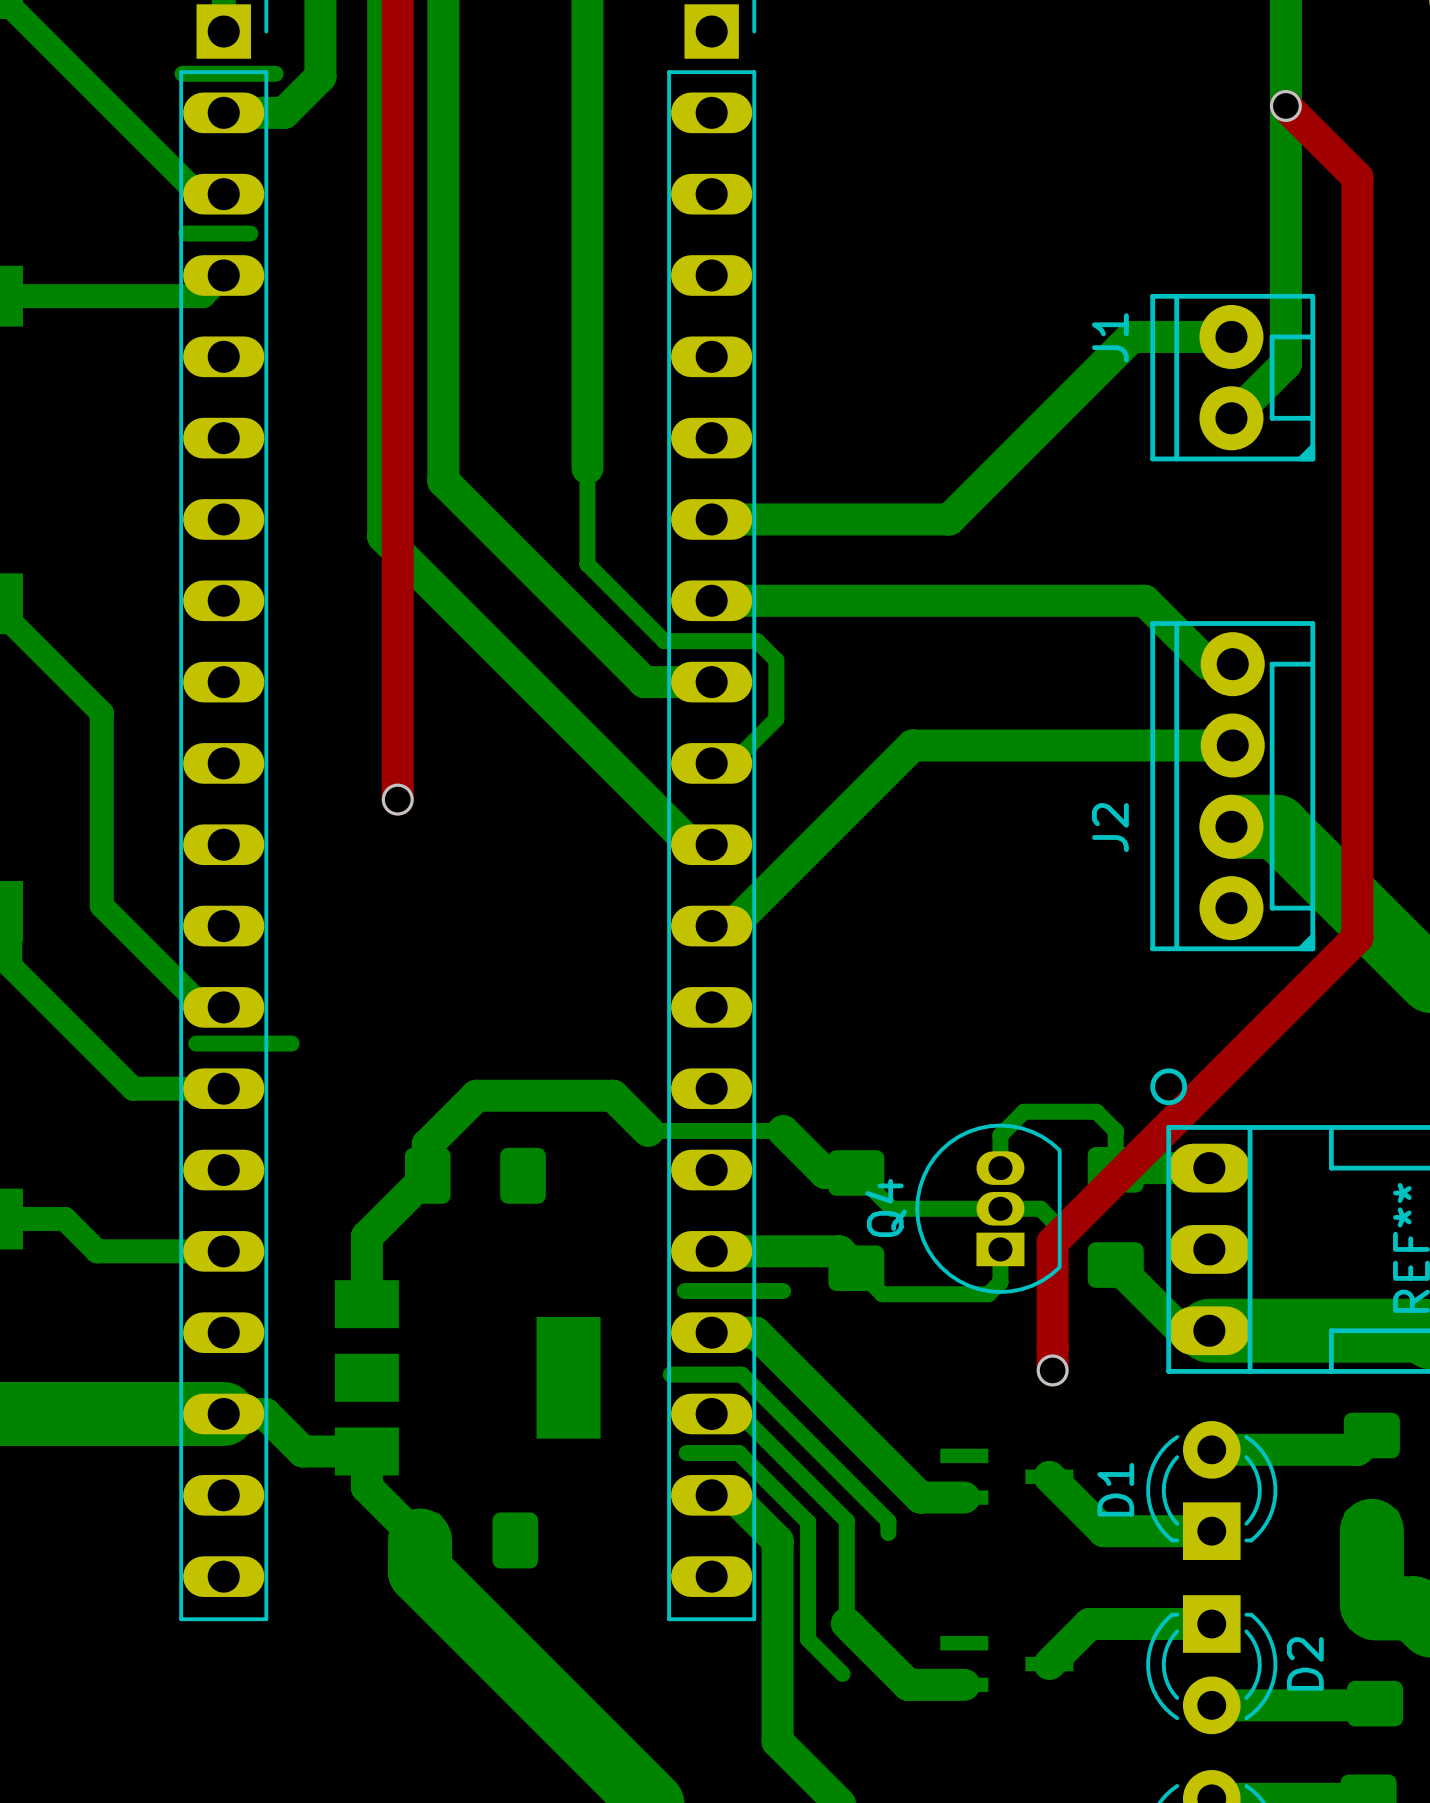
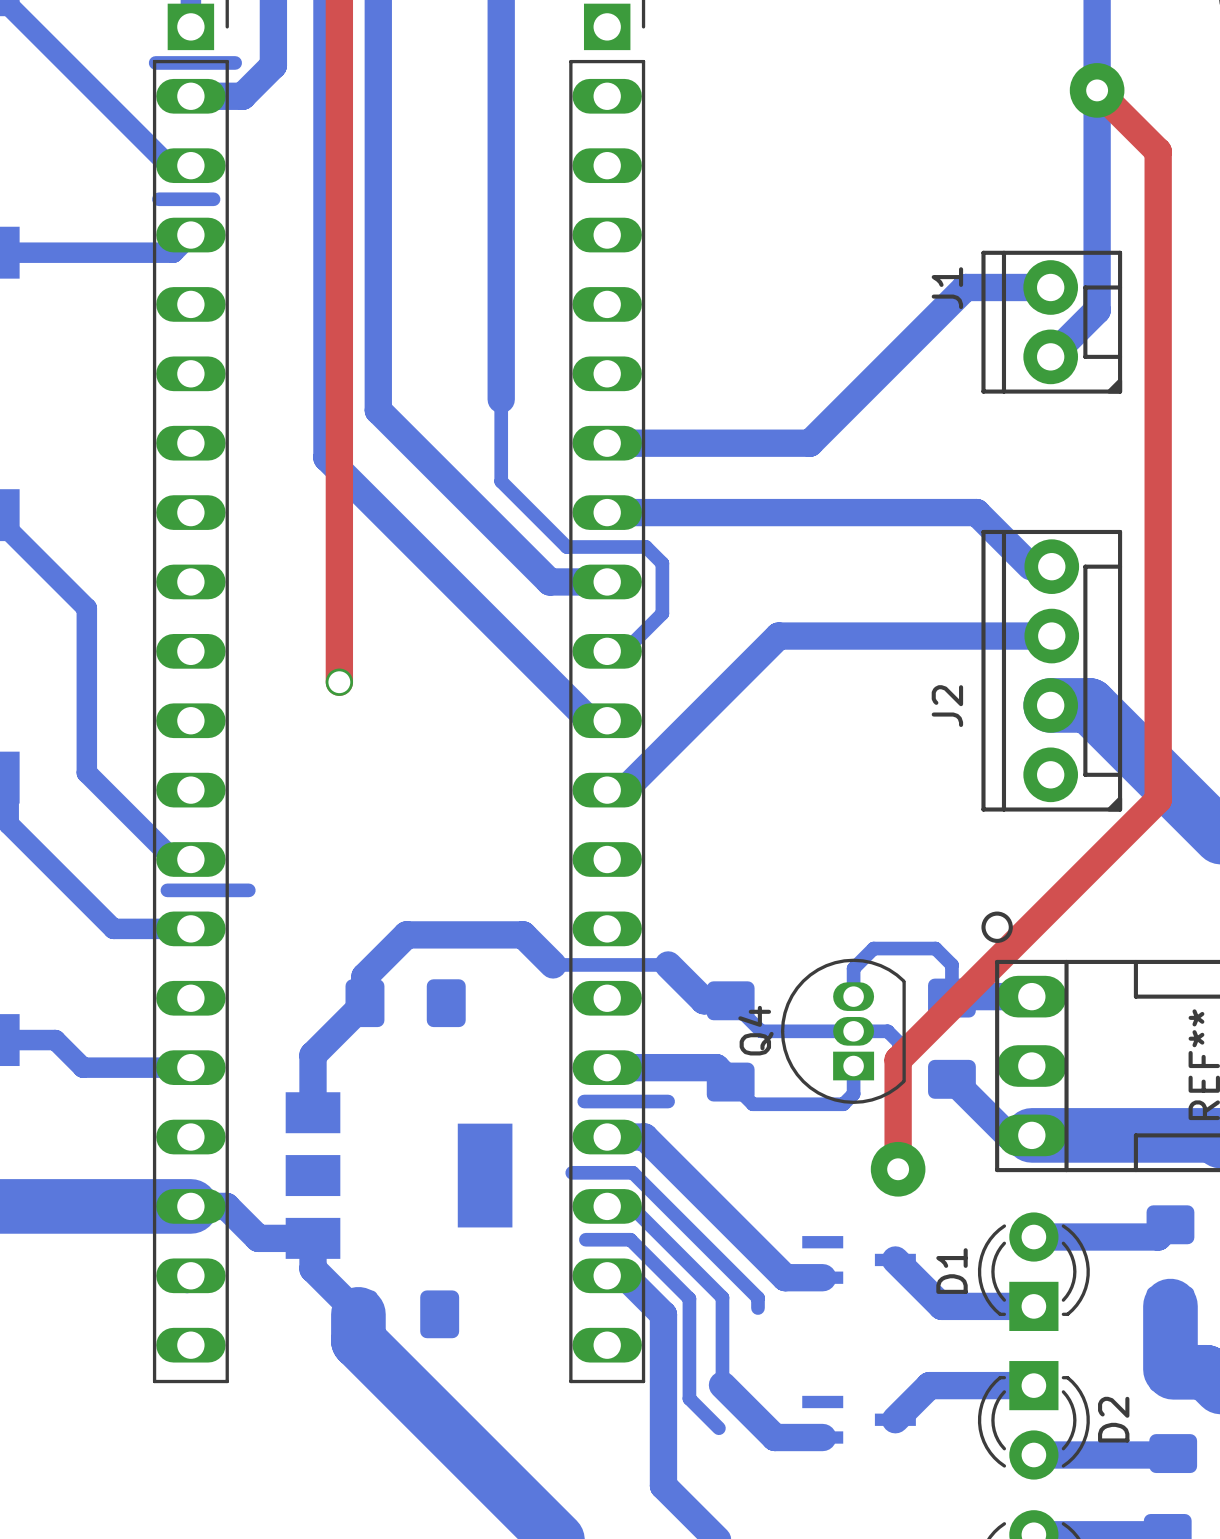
via size: [1269, 89, 1302, 122] -> [1069, 63, 1125, 118]
via size: [1036, 1354, 1069, 1387] -> [870, 1141, 926, 1197]

